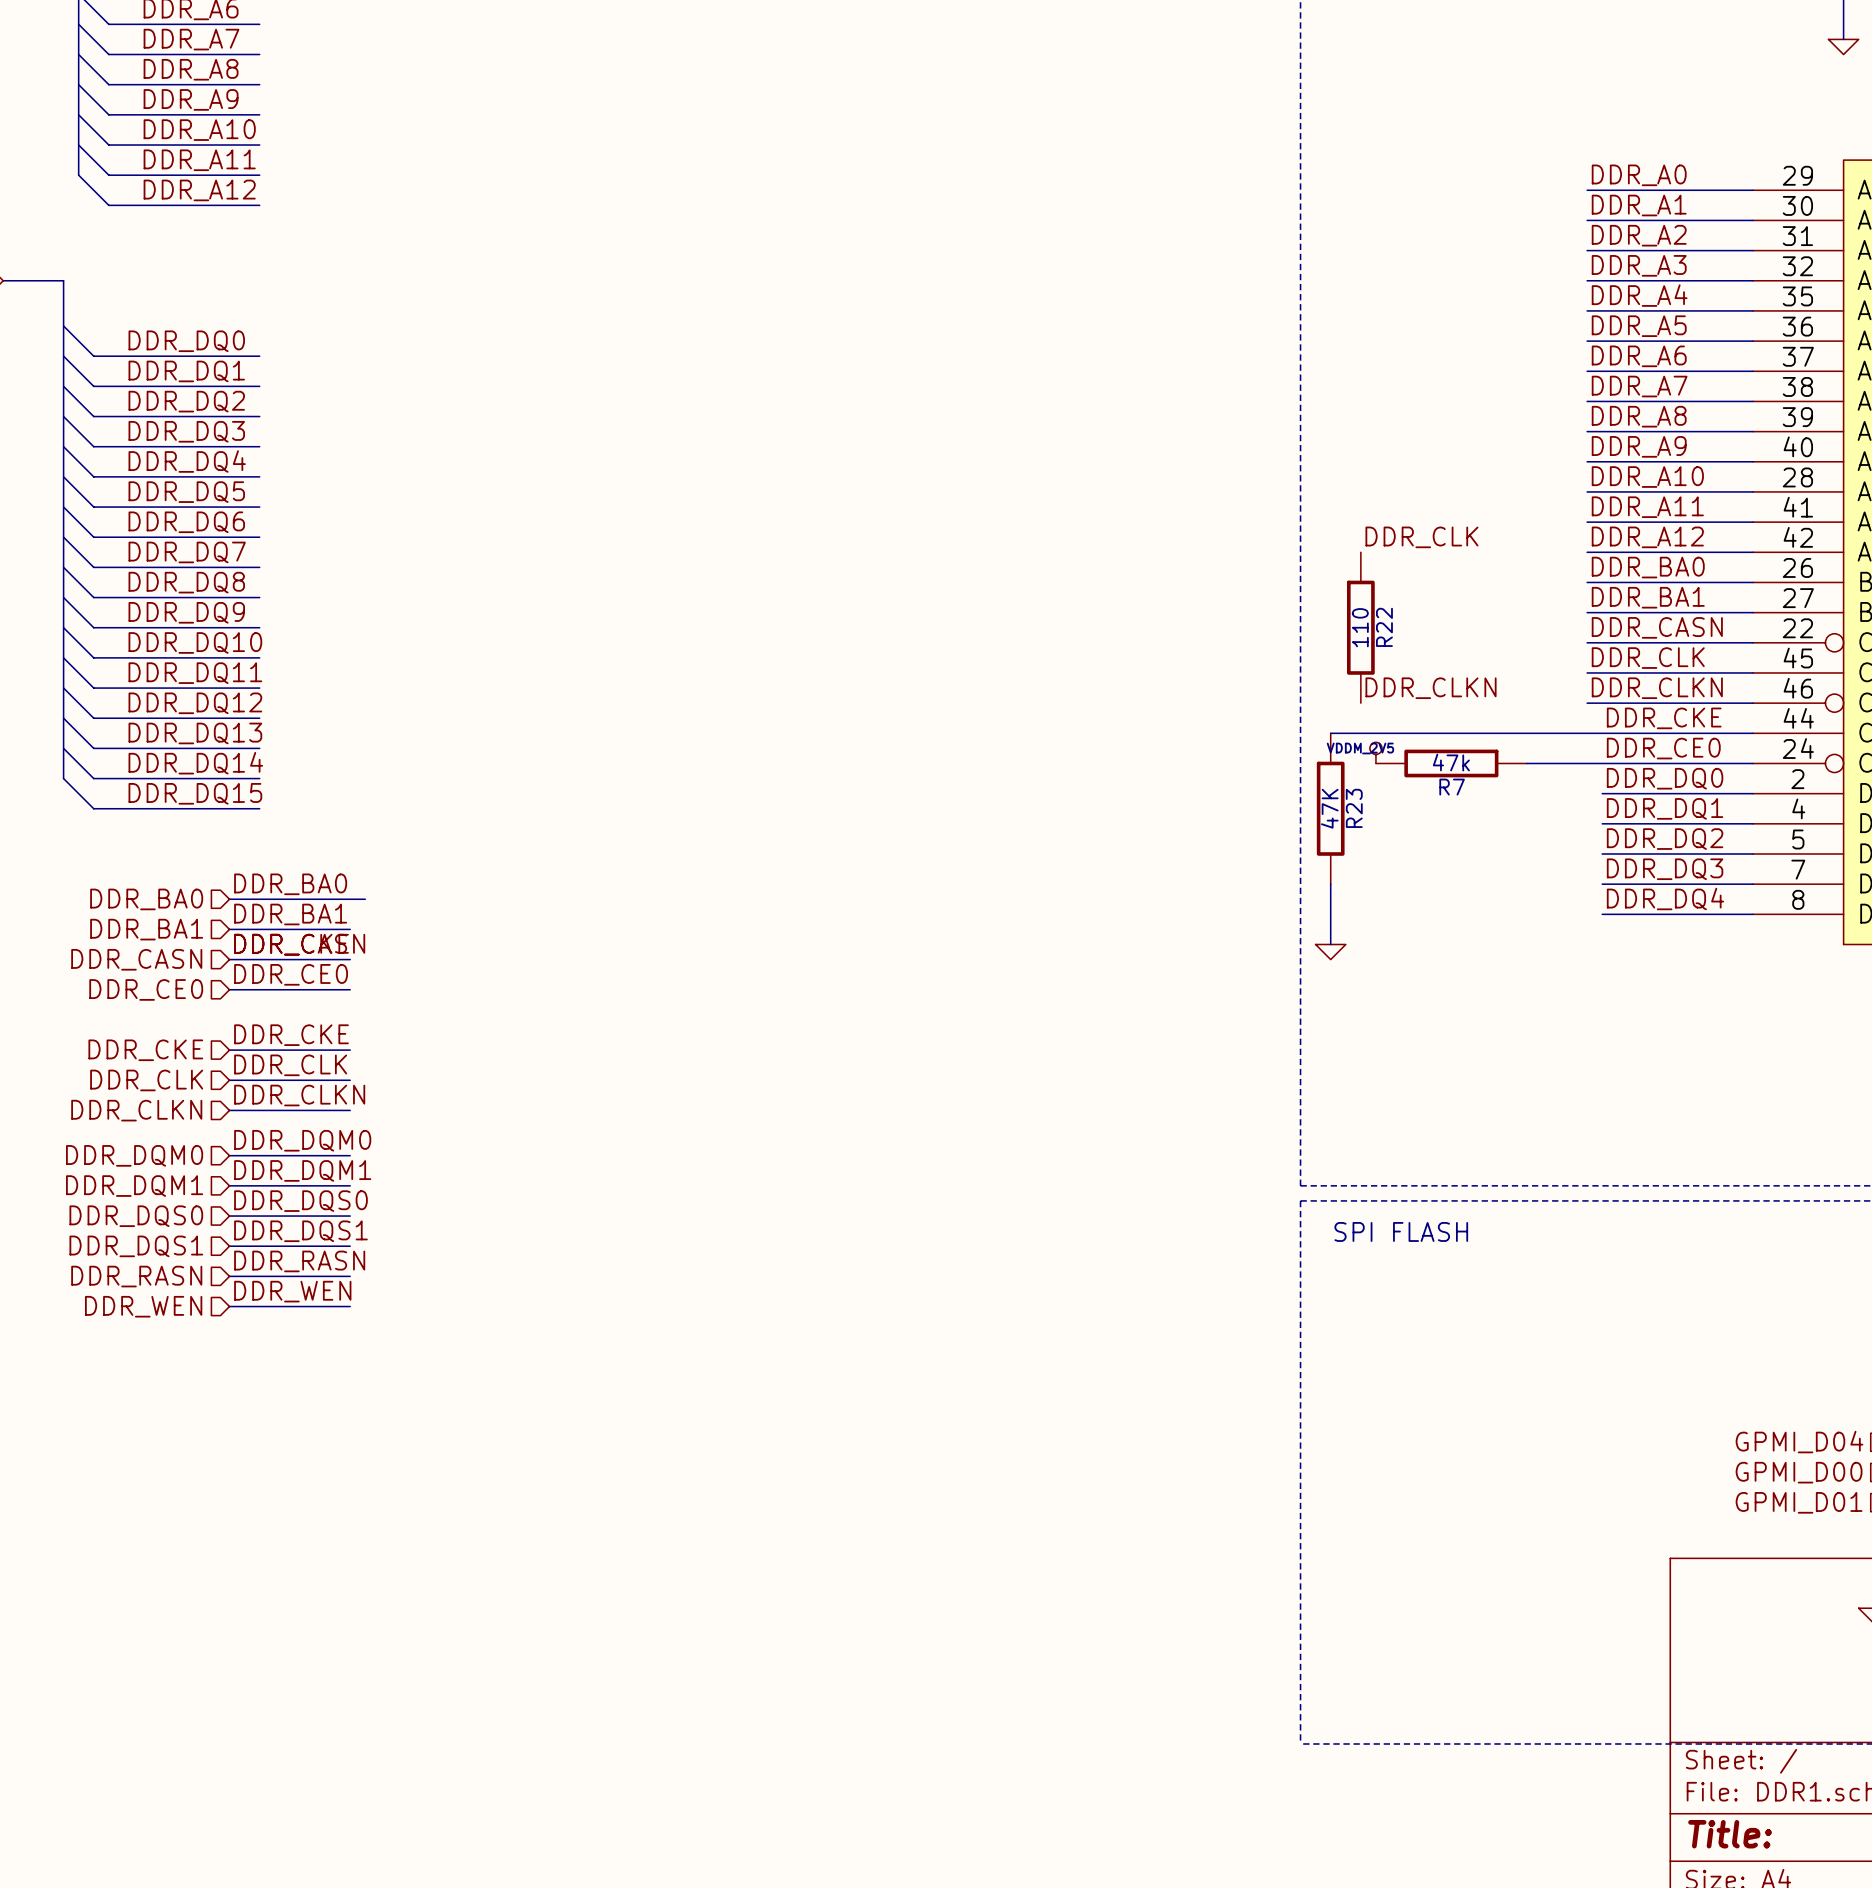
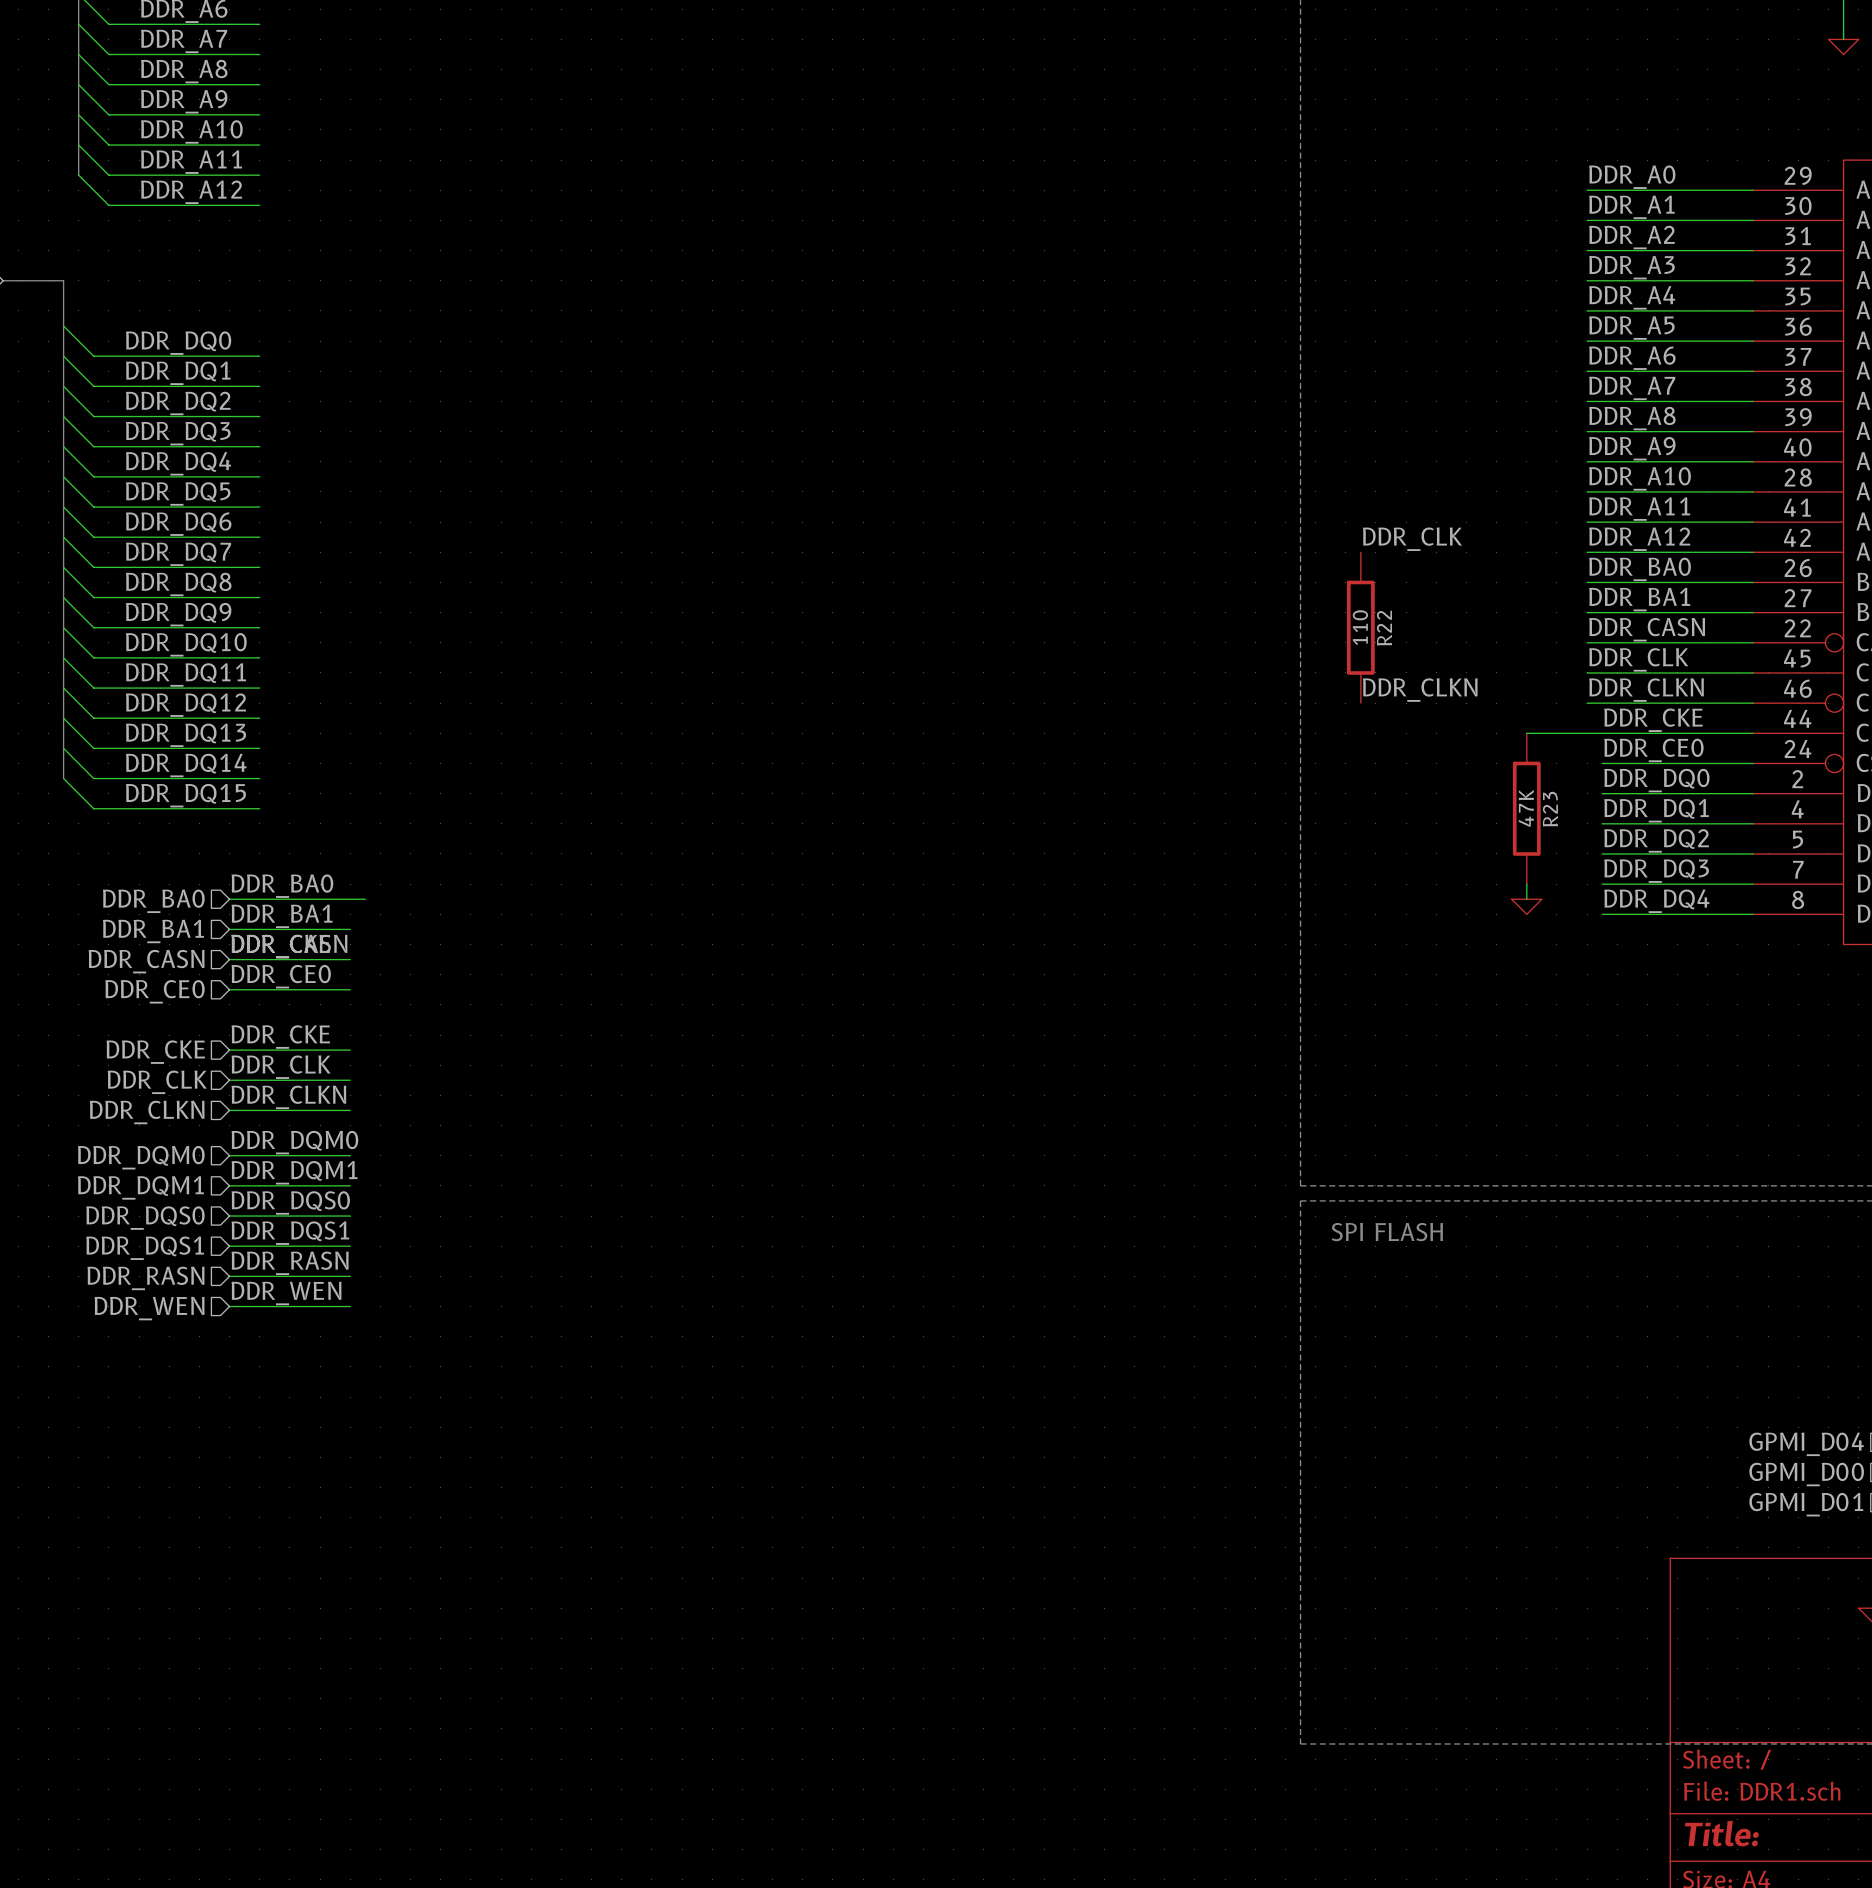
wire: (1330, 733) (1526, 733) -> none
power symbol: VDDM_2V5 (1375, 752) -> none
R7: 47k (1451, 763) -> none
wire: (1526, 763) (1602, 763) -> none
R23 position: (1330, 808) -> (1526, 808)
wire: (1330, 884) (1330, 944) -> none
wire: none -> (1526, 884) (1526, 899)
power symbol position: (1330, 952) -> (1526, 906)

